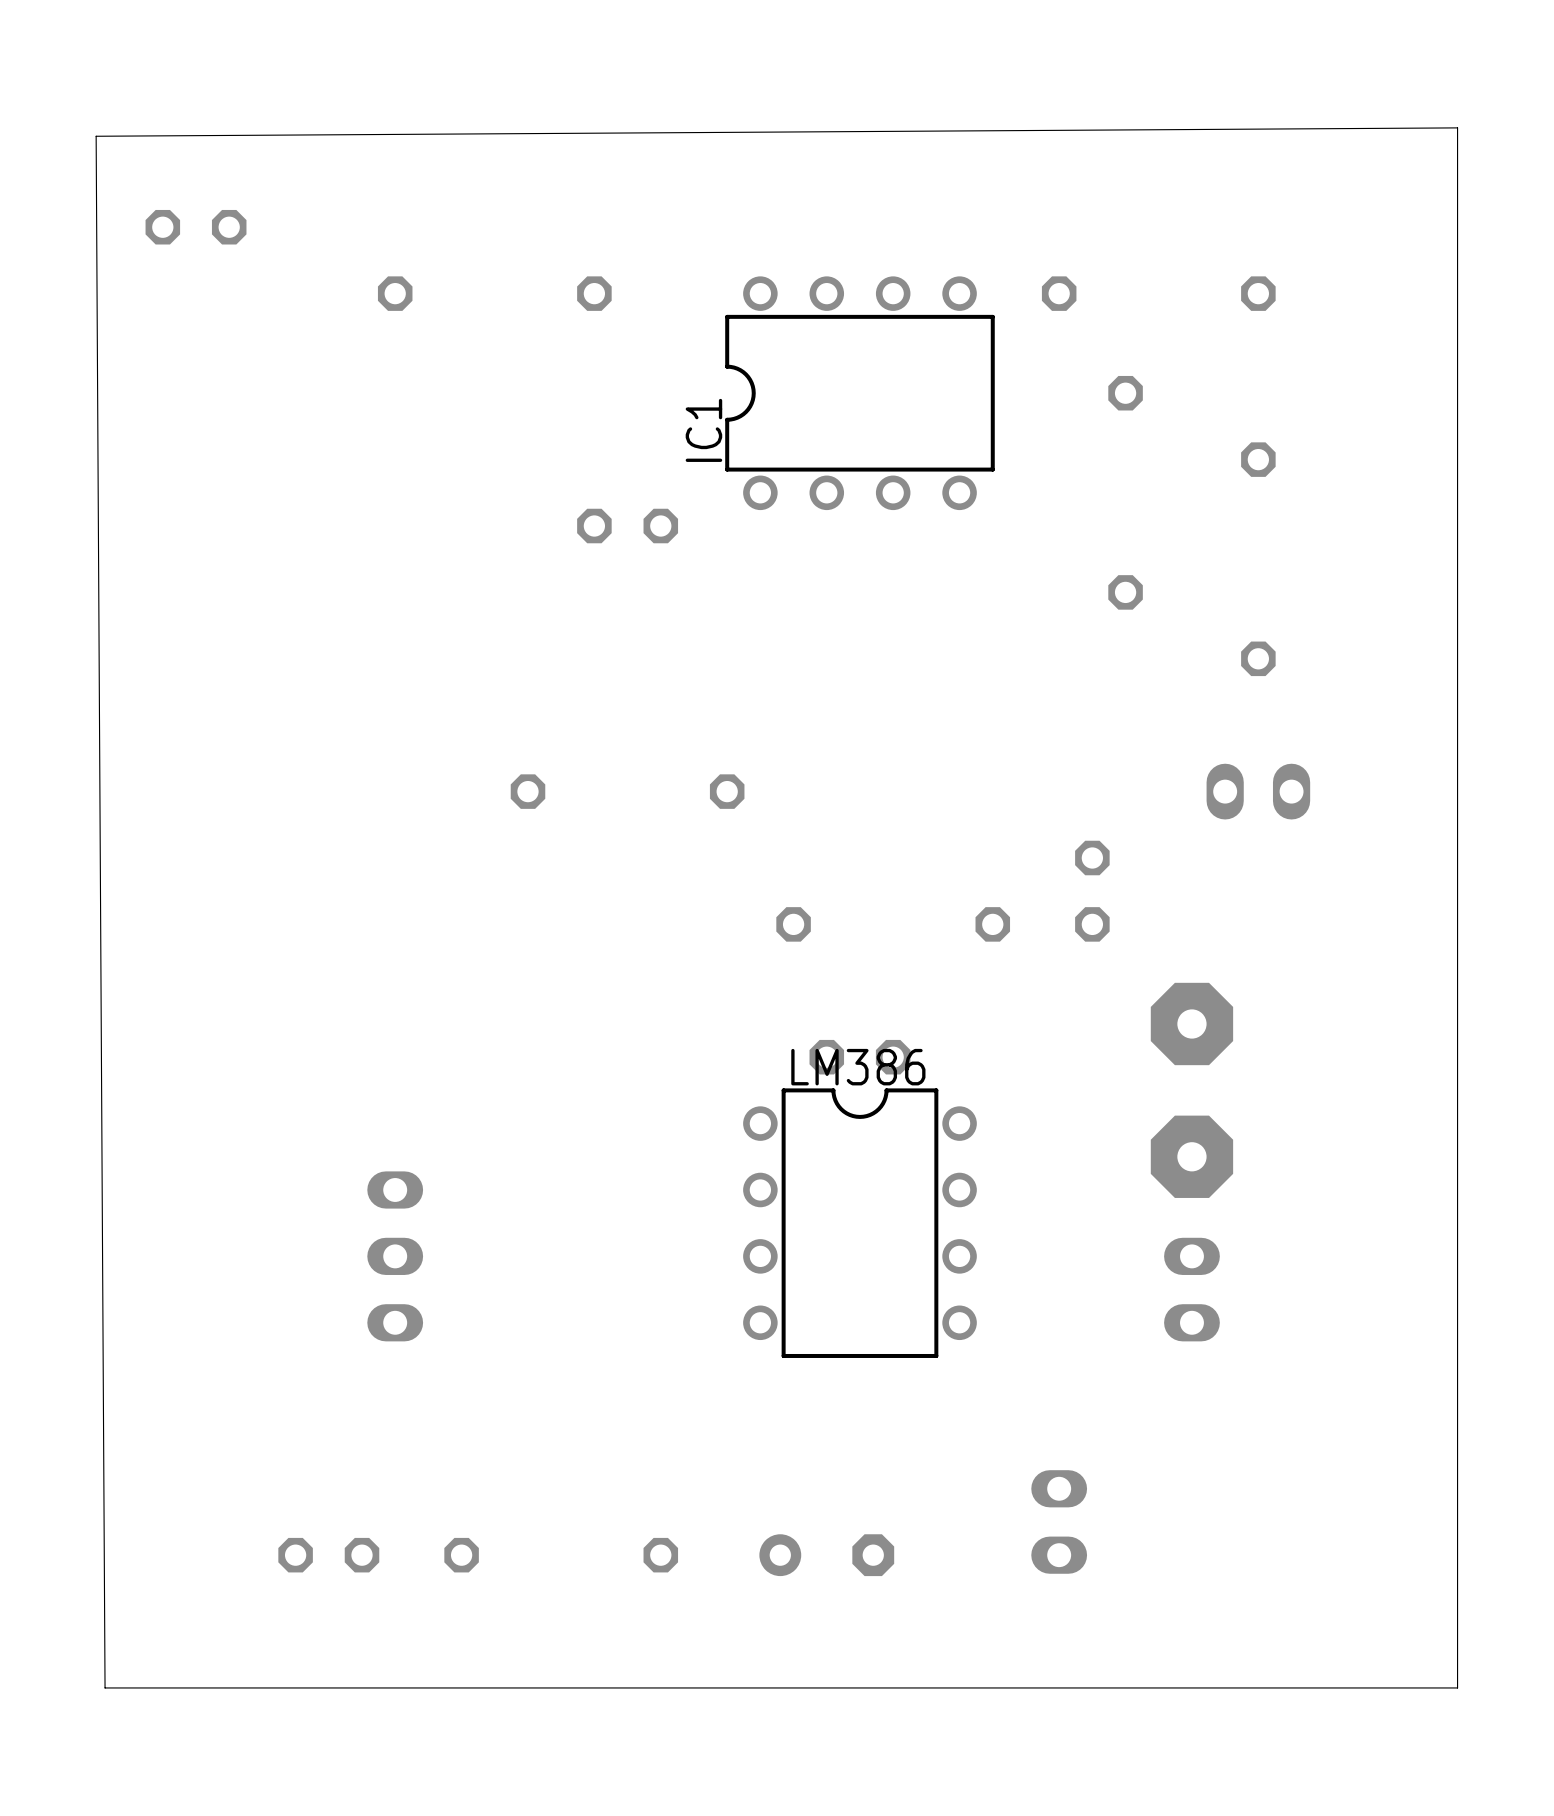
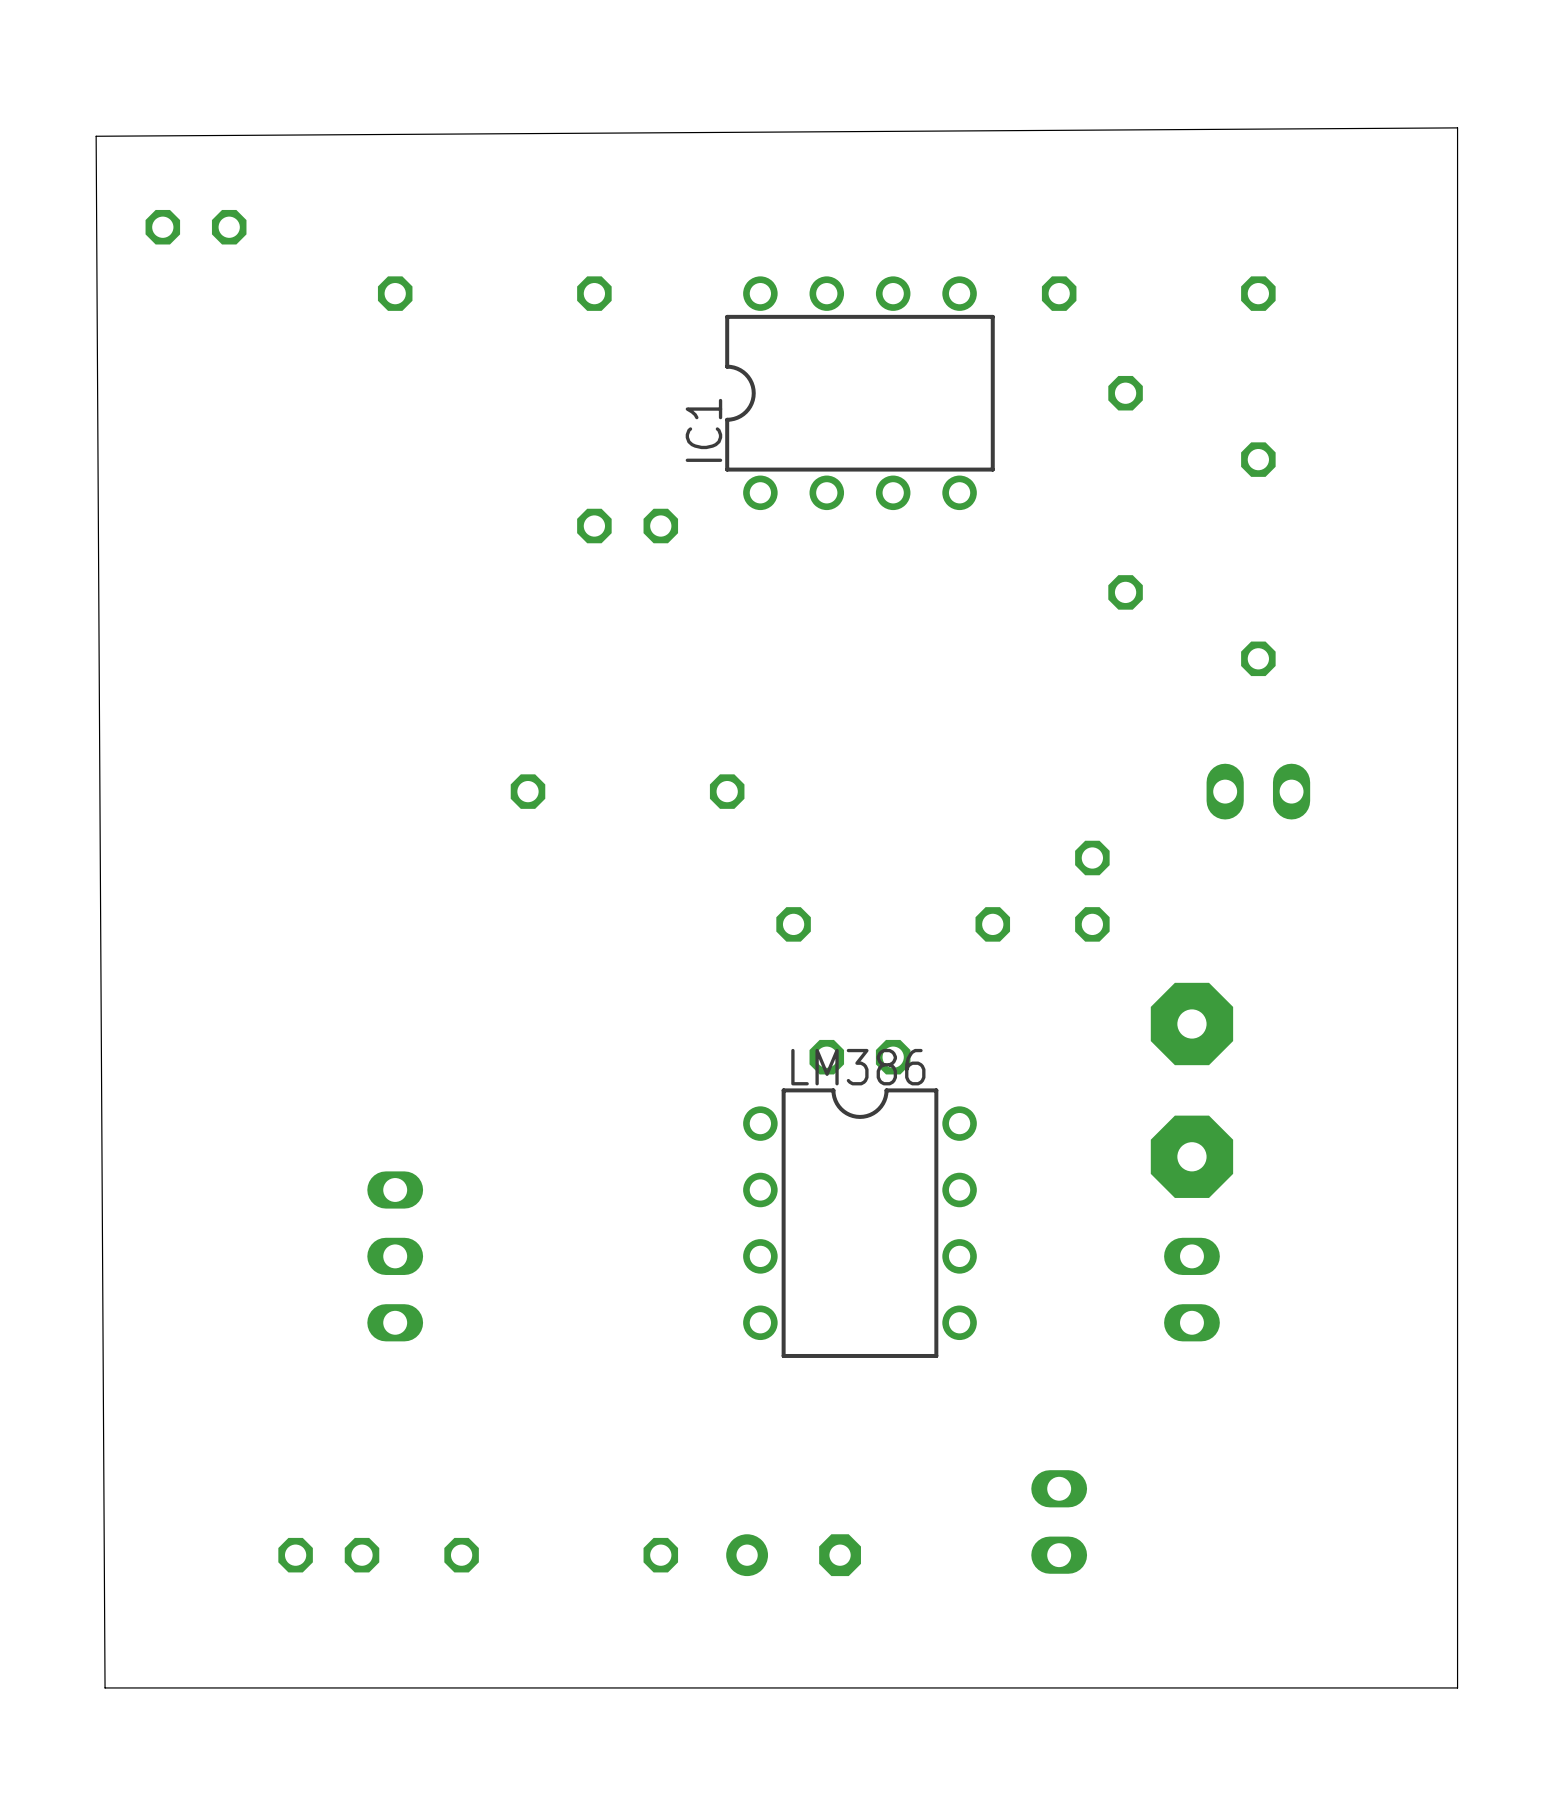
part position: (826, 1555) -> (793, 1555)

